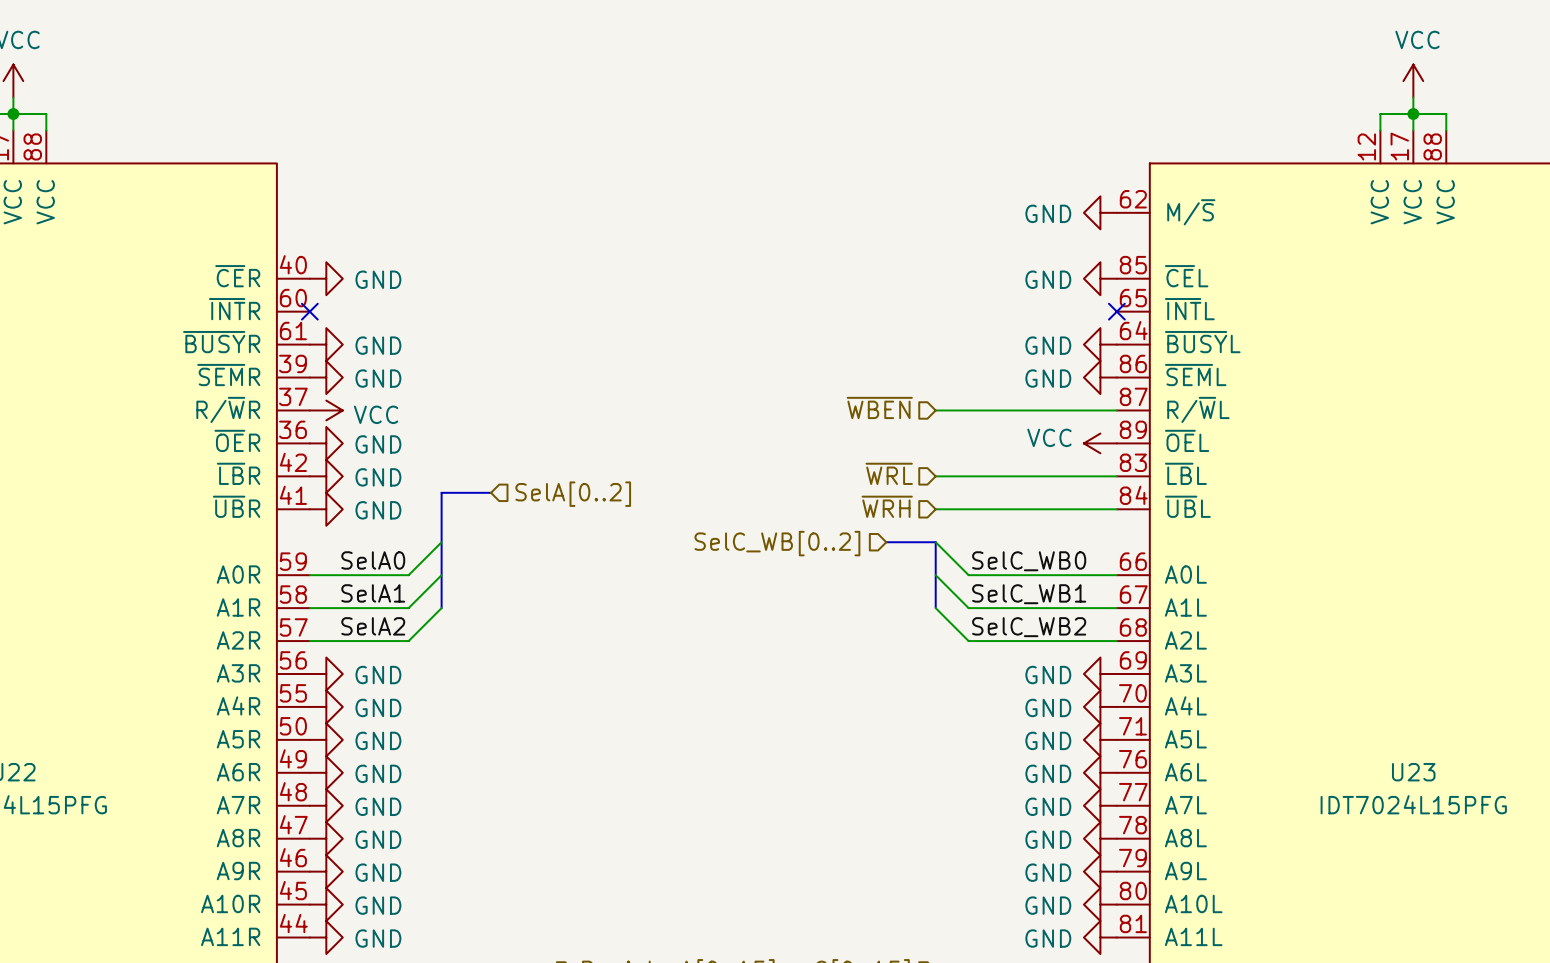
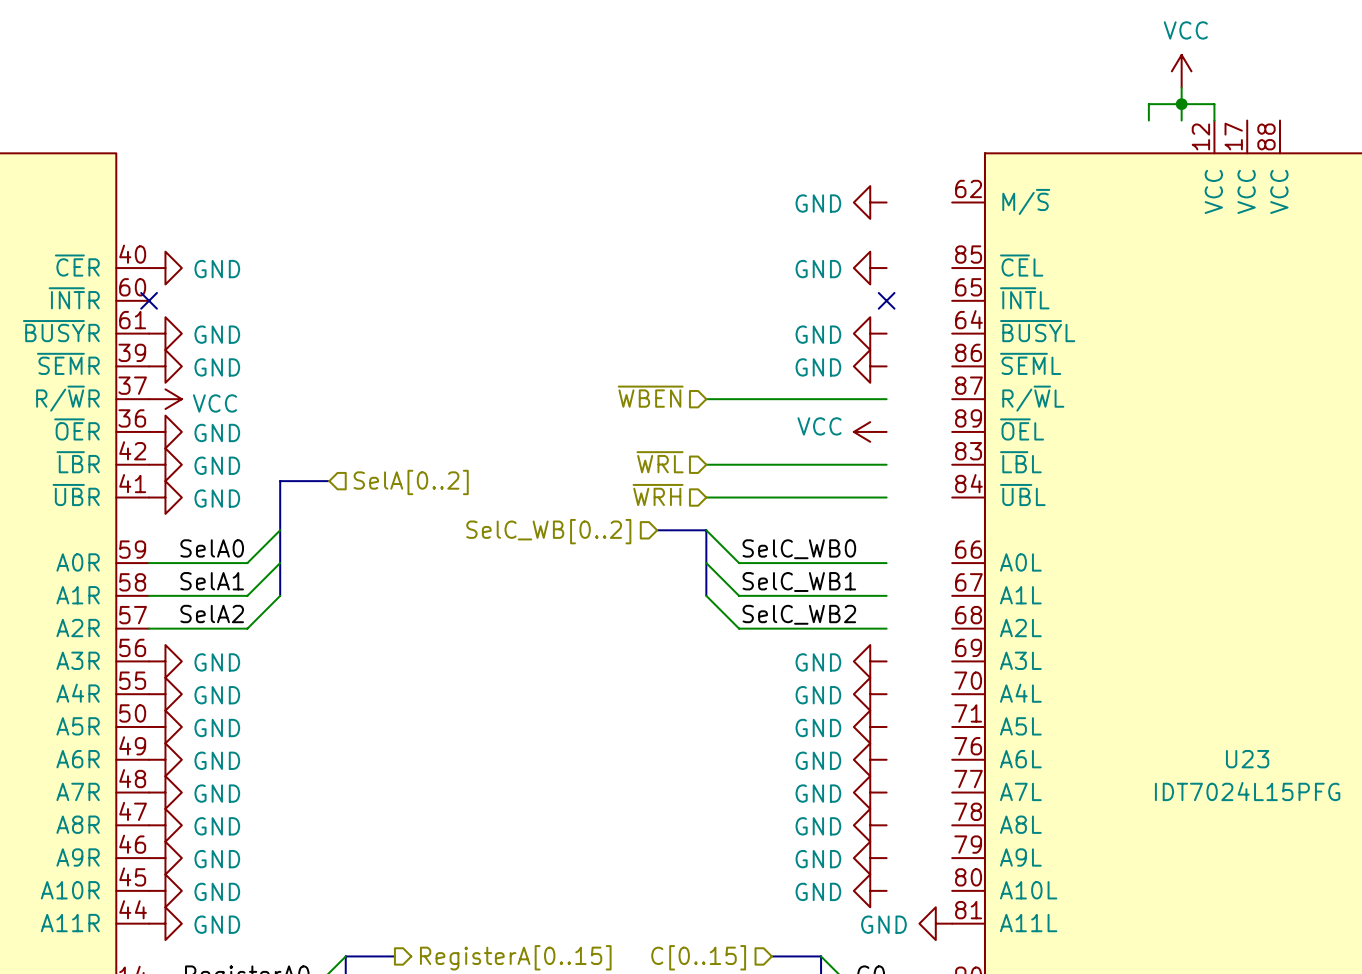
power symbol position: VCC (1413, 81) -> VCC (1181, 71)
wire: (1413, 97) (1413, 130) -> (1181, 87) (1181, 120)
wire: (1380, 114) (1446, 114) (1446, 130) -> (1214, 104) (1148, 104) (1148, 120)
junction position: (1413, 114) -> (1181, 104)
power symbol: none -> GND (870, 202)
power symbol: GND (1100, 212) -> none
power symbol: none -> GND (870, 268)
power symbol: GND (1100, 278) -> none
no-connect mark position: (1116, 311) -> (886, 300)
power symbol: none -> GND (870, 333)
power symbol: GND (1100, 344) -> none
power symbol: none -> GND (870, 366)
power symbol: GND (1100, 377) -> none
hierarchical label position: ~{WBEN} (879, 407) -> ~{WBEN} (650, 396)
wire: (1051, 410) (1116, 410) -> (706, 399) (771, 399)
power symbol position: VCC (1100, 443) -> VCC (870, 431)
hierarchical label position: ~{WRL} (889, 473) -> ~{WRL} (660, 462)
wire: (1051, 476) (1116, 476) -> (706, 464) (771, 464)
hierarchical label position: ~{WRH} (887, 506) -> ~{WRH} (658, 495)
wire: (1051, 509) (1116, 509) -> (706, 497) (771, 497)
bus: (886, 542) (935, 542) (935, 608) -> (657, 530) (706, 530) (706, 595)
wire: (935, 542) (968, 575) -> (706, 530) (739, 563) (804, 563)
hierarchical label position: SelC_WB[0..2] (777, 543) -> SelC_WB[0..2] (548, 531)
label position: SelC_WB0 (1029, 561) -> SelC_WB0 (799, 549)
wire: (935, 575) (968, 608) -> (706, 563) (739, 595) (804, 595)
wire: (1051, 575) (1116, 575) -> none
label position: SelC_WB1 (1029, 594) -> SelC_WB1 (799, 582)
wire: (935, 608) (968, 641) -> (706, 595) (739, 628) (804, 628)
wire: (1051, 608) (1116, 608) -> none
label position: SelC_WB2 (1029, 627) -> SelC_WB2 (799, 614)
wire: (1051, 641) (1116, 641) -> none
power symbol: none -> GND (870, 661)
power symbol: GND (1100, 674) -> none
power symbol: none -> GND (870, 694)
power symbol: GND (1100, 706) -> none
power symbol: none -> GND (870, 726)
power symbol: GND (1100, 739) -> none
power symbol: none -> GND (870, 759)
power symbol: GND (1100, 772) -> none
power symbol: none -> GND (870, 792)
power symbol: GND (1100, 805) -> none
power symbol: none -> GND (870, 825)
power symbol: GND (1100, 838) -> none
power symbol: none -> GND (870, 858)
power symbol: GND (1100, 871) -> none
power symbol: none -> GND (870, 890)
power symbol: GND (1100, 904) -> none

